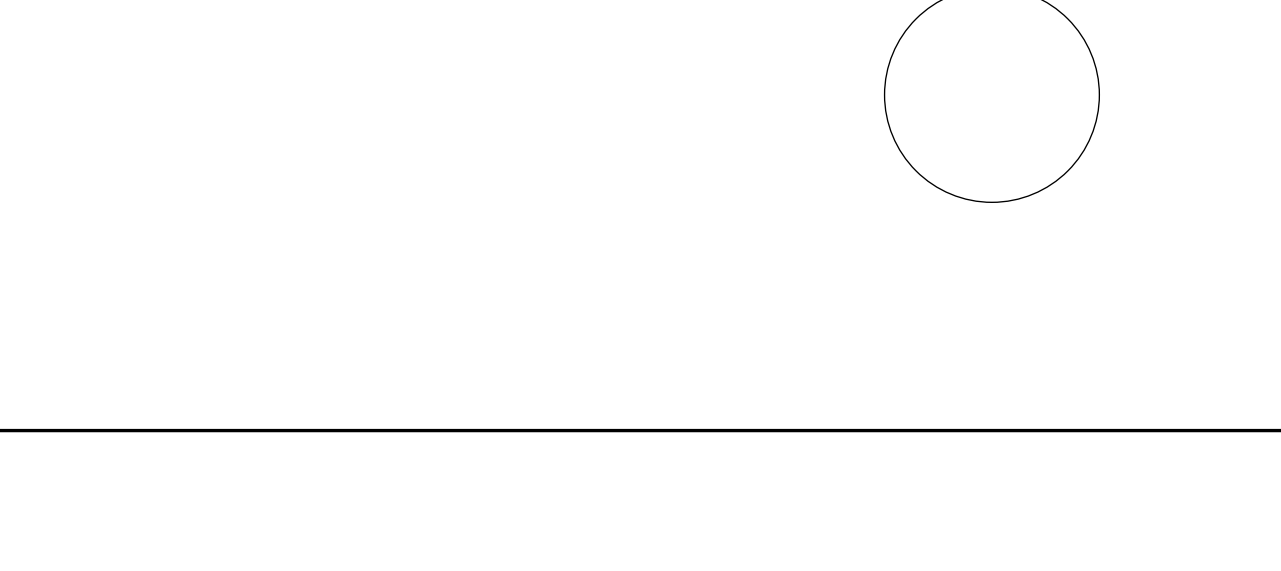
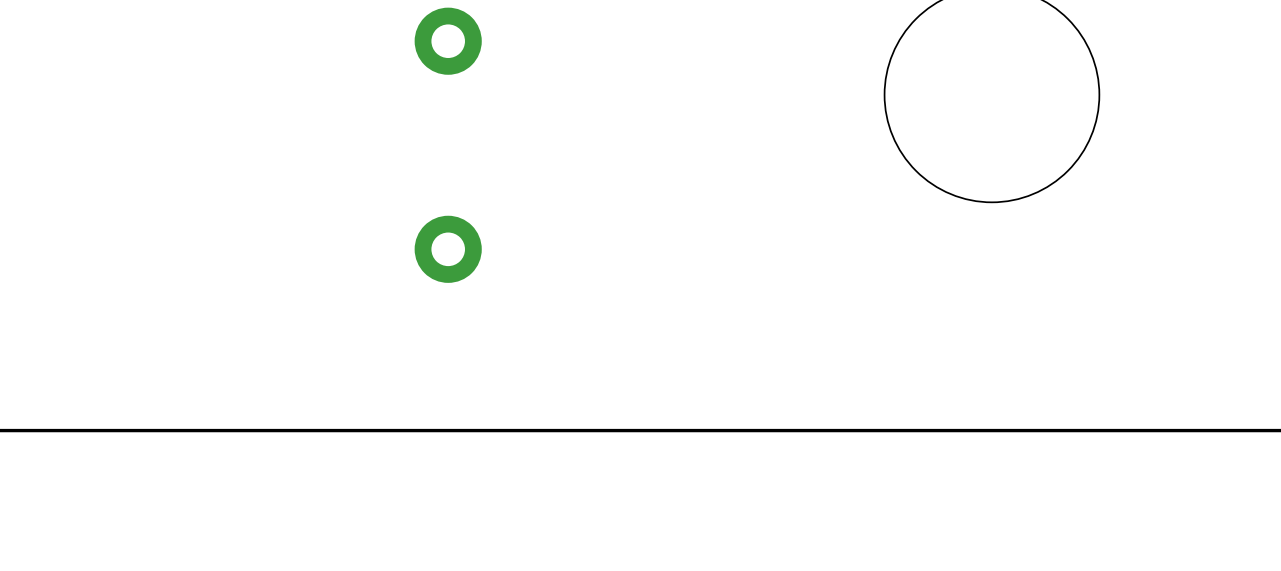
part: none -> (448, 41)
part: none -> (448, 249)

